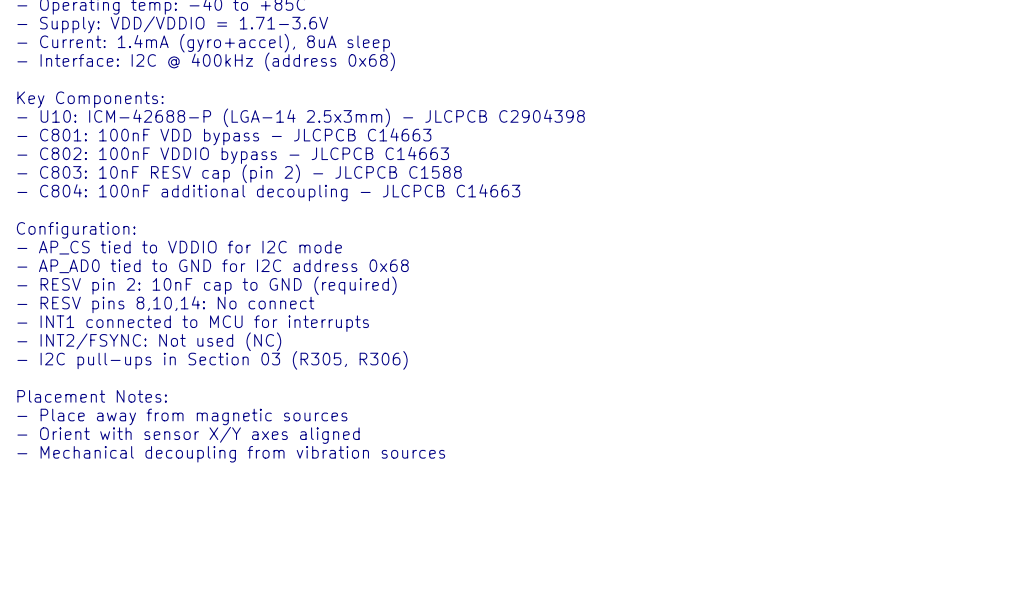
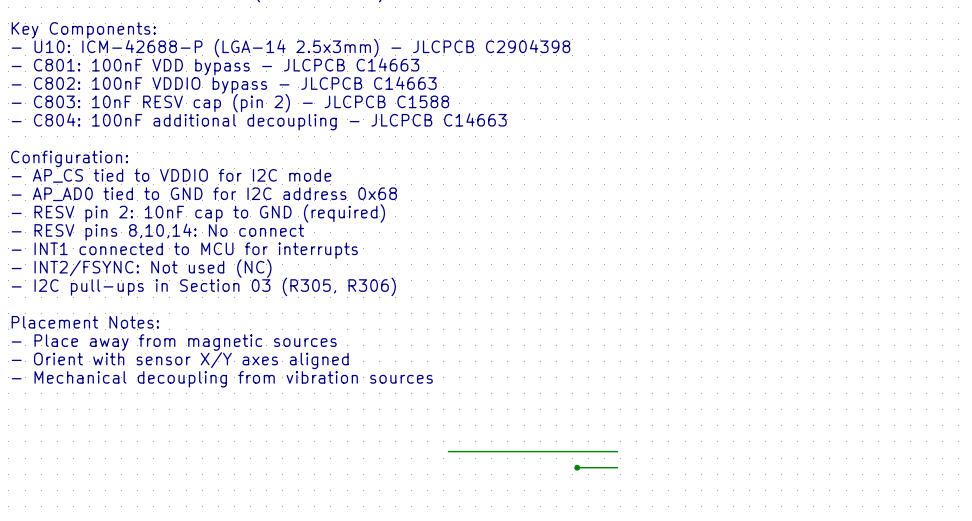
wire: none -> (448, 451) (617, 451)
wire: none -> (577, 467) (617, 467)
junction: none -> (577, 467)

